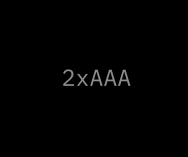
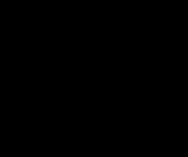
text: 2xAAA (96, 77) -> none

